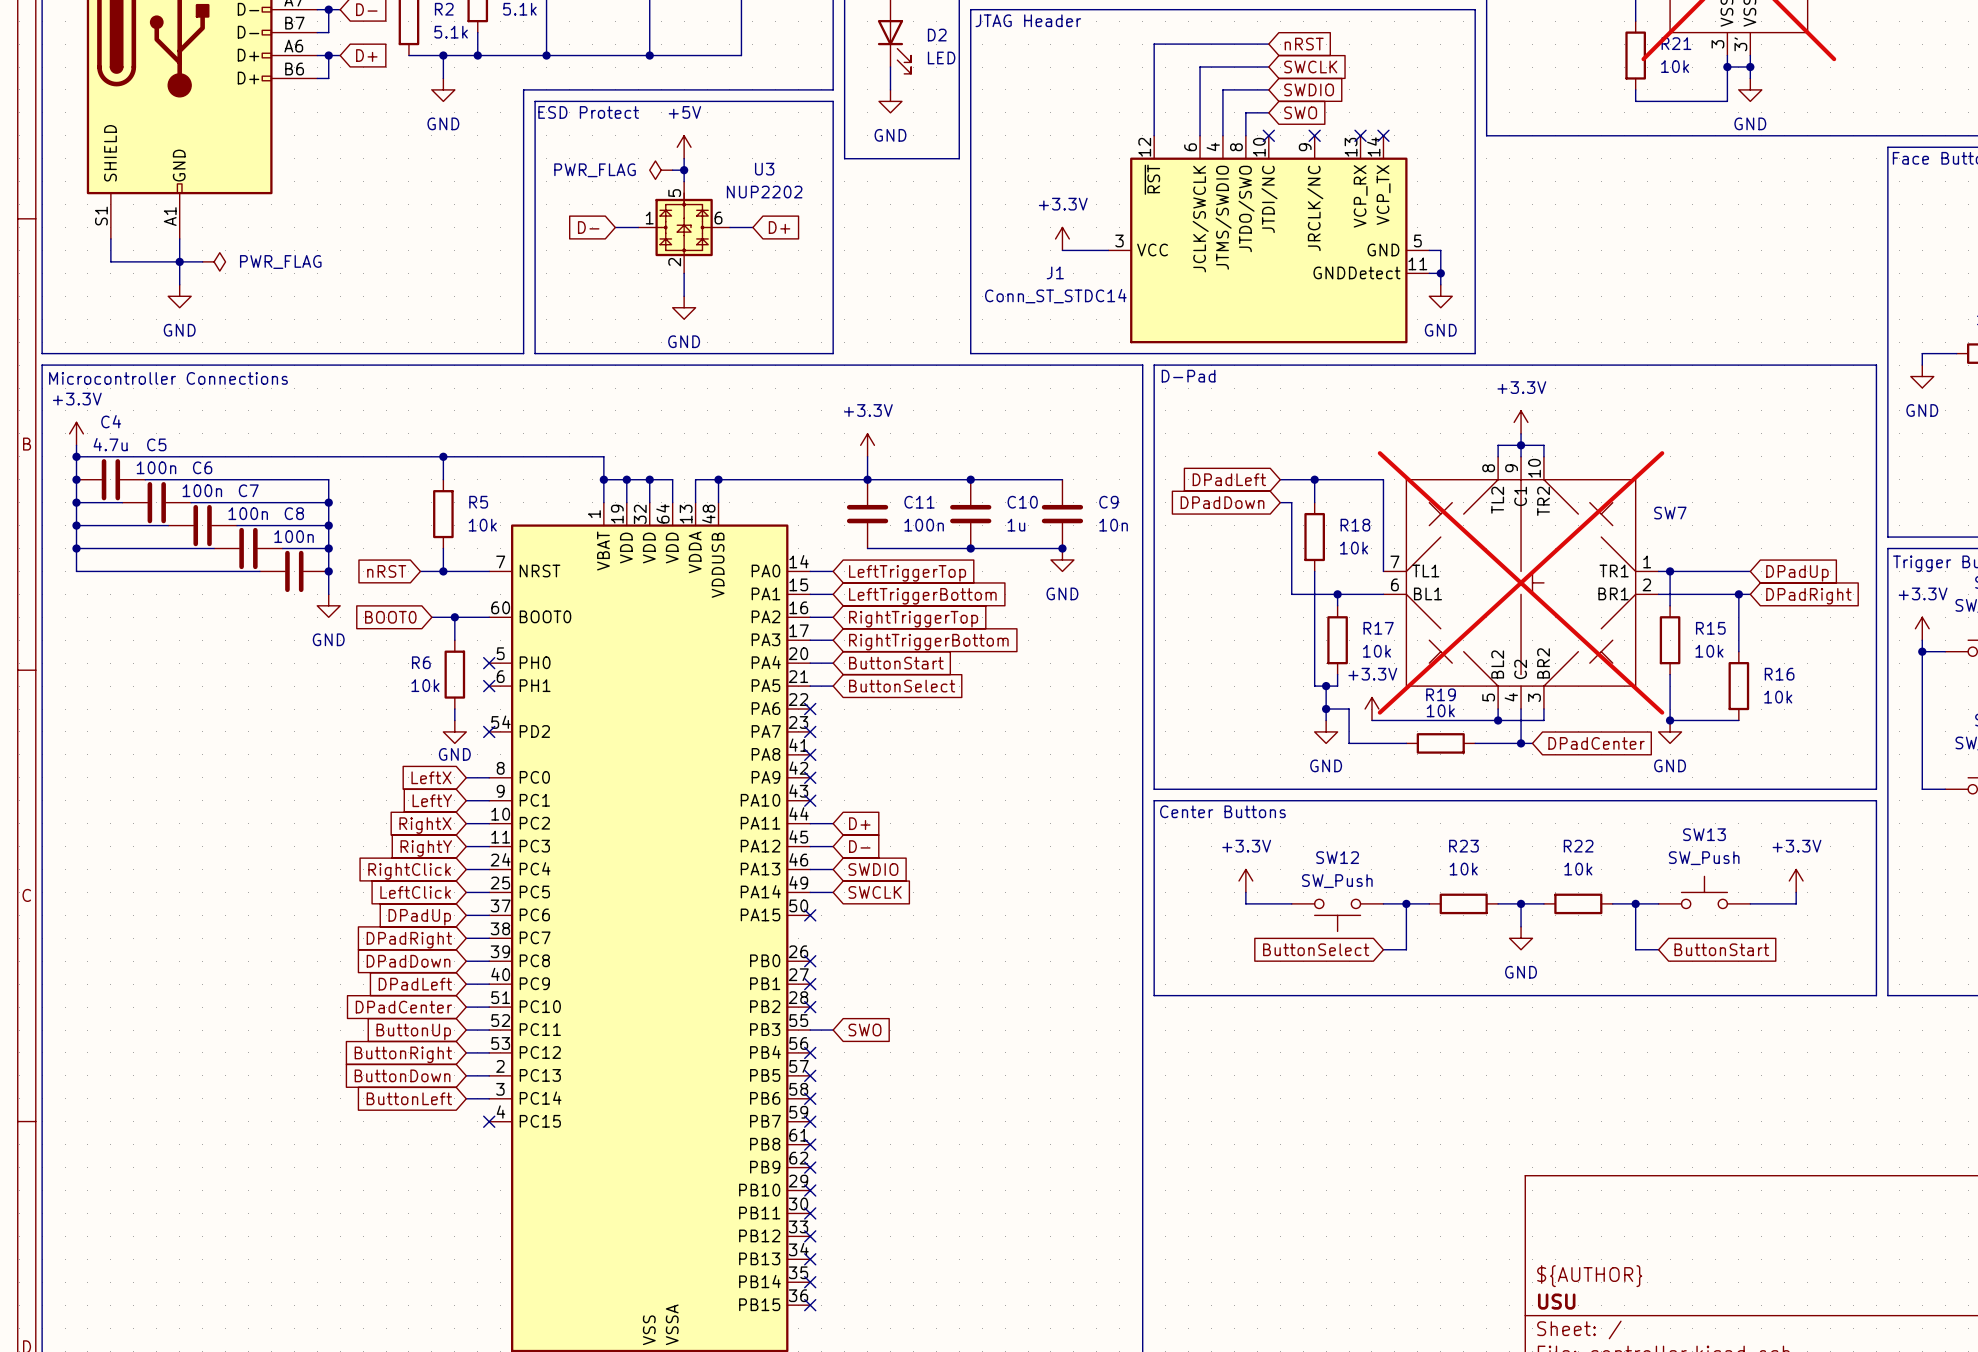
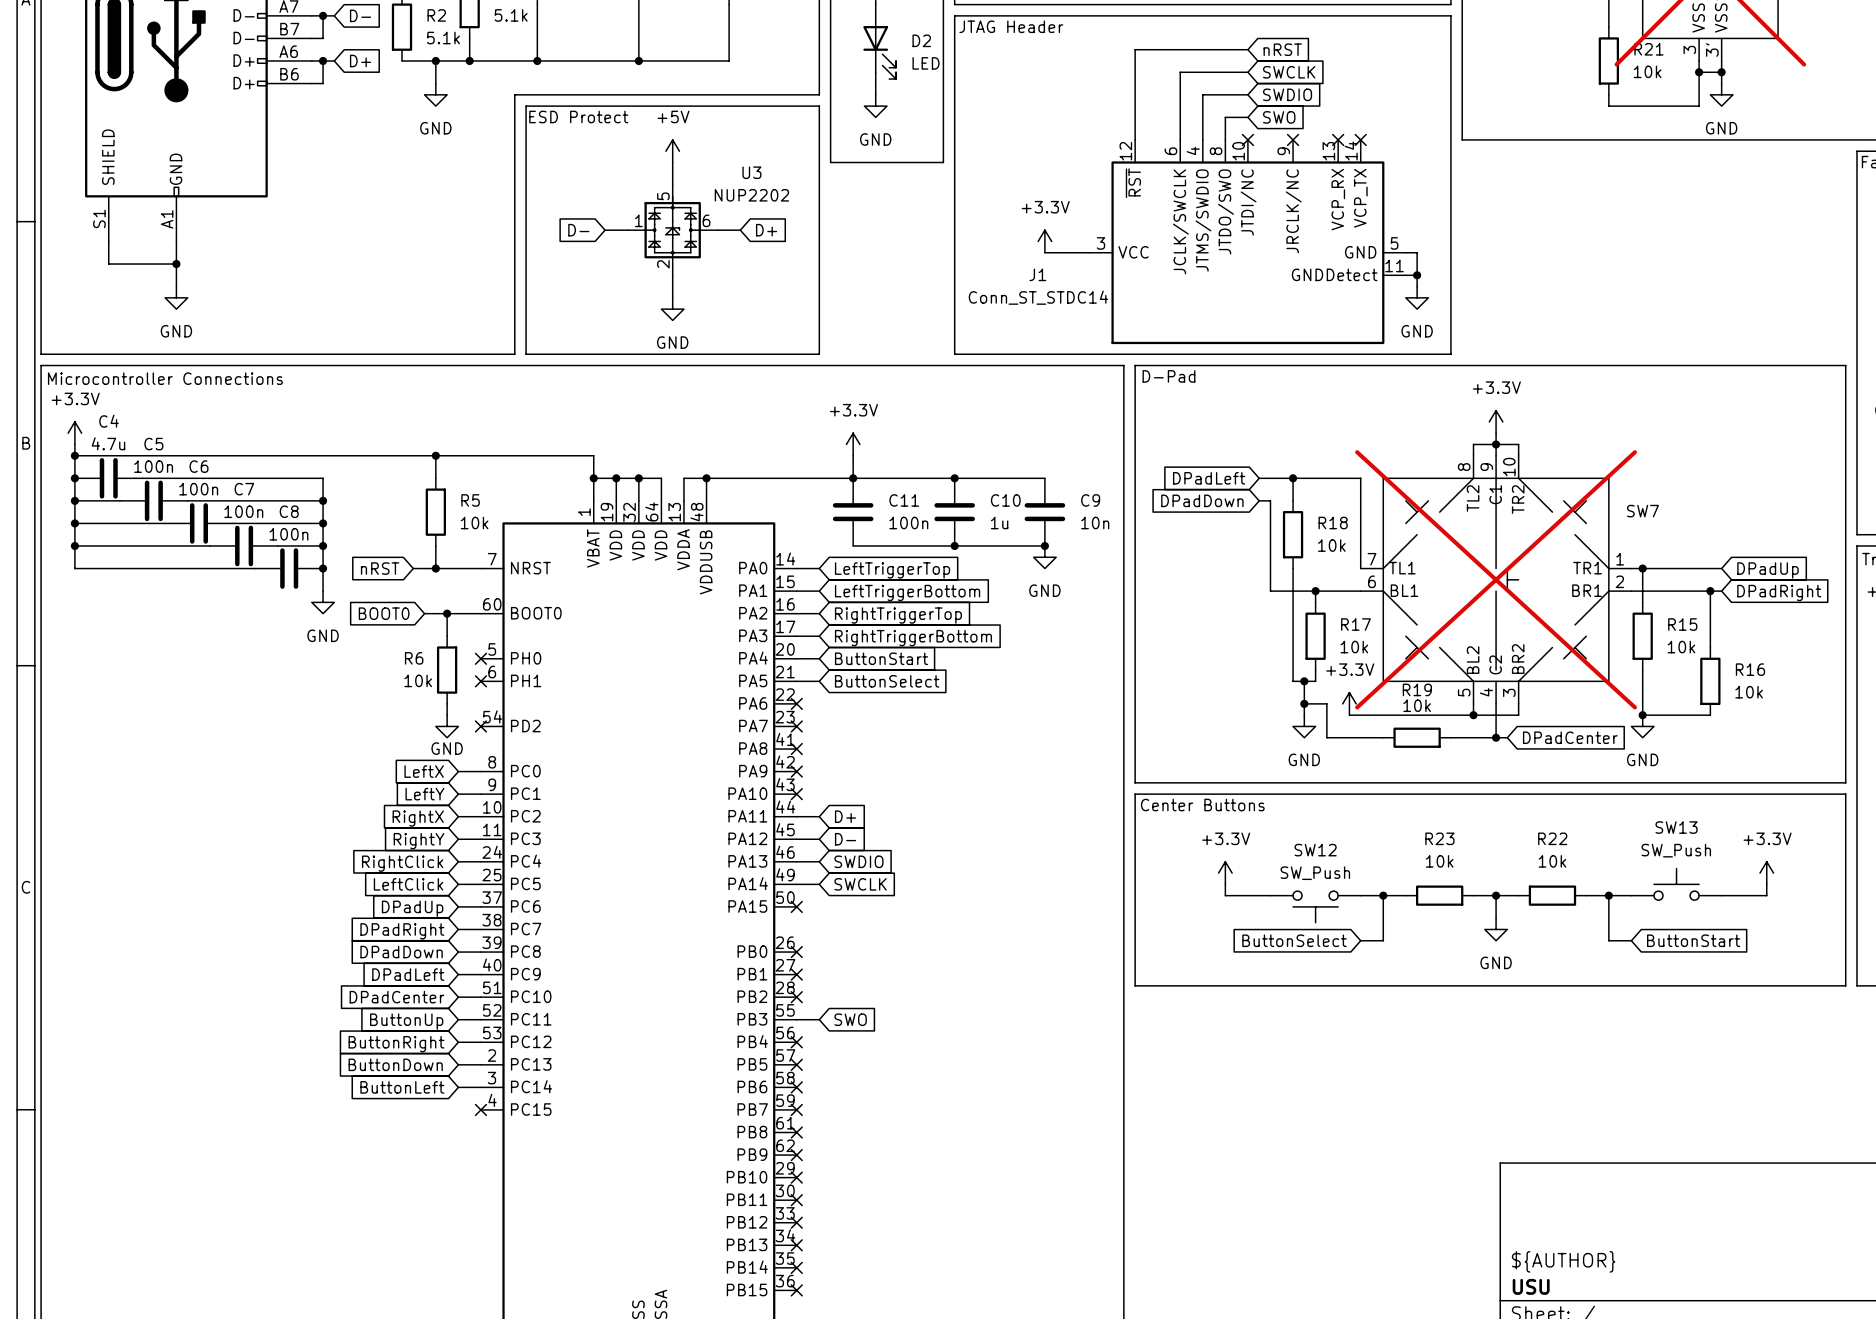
power symbol: PWR_FLAG (661, 170) -> none
wire: (672, 170) (684, 170) -> none
junction: (684, 170) -> none
wire: (179, 261) (202, 261) -> none
power symbol: PWR_FLAG (214, 261) -> none

